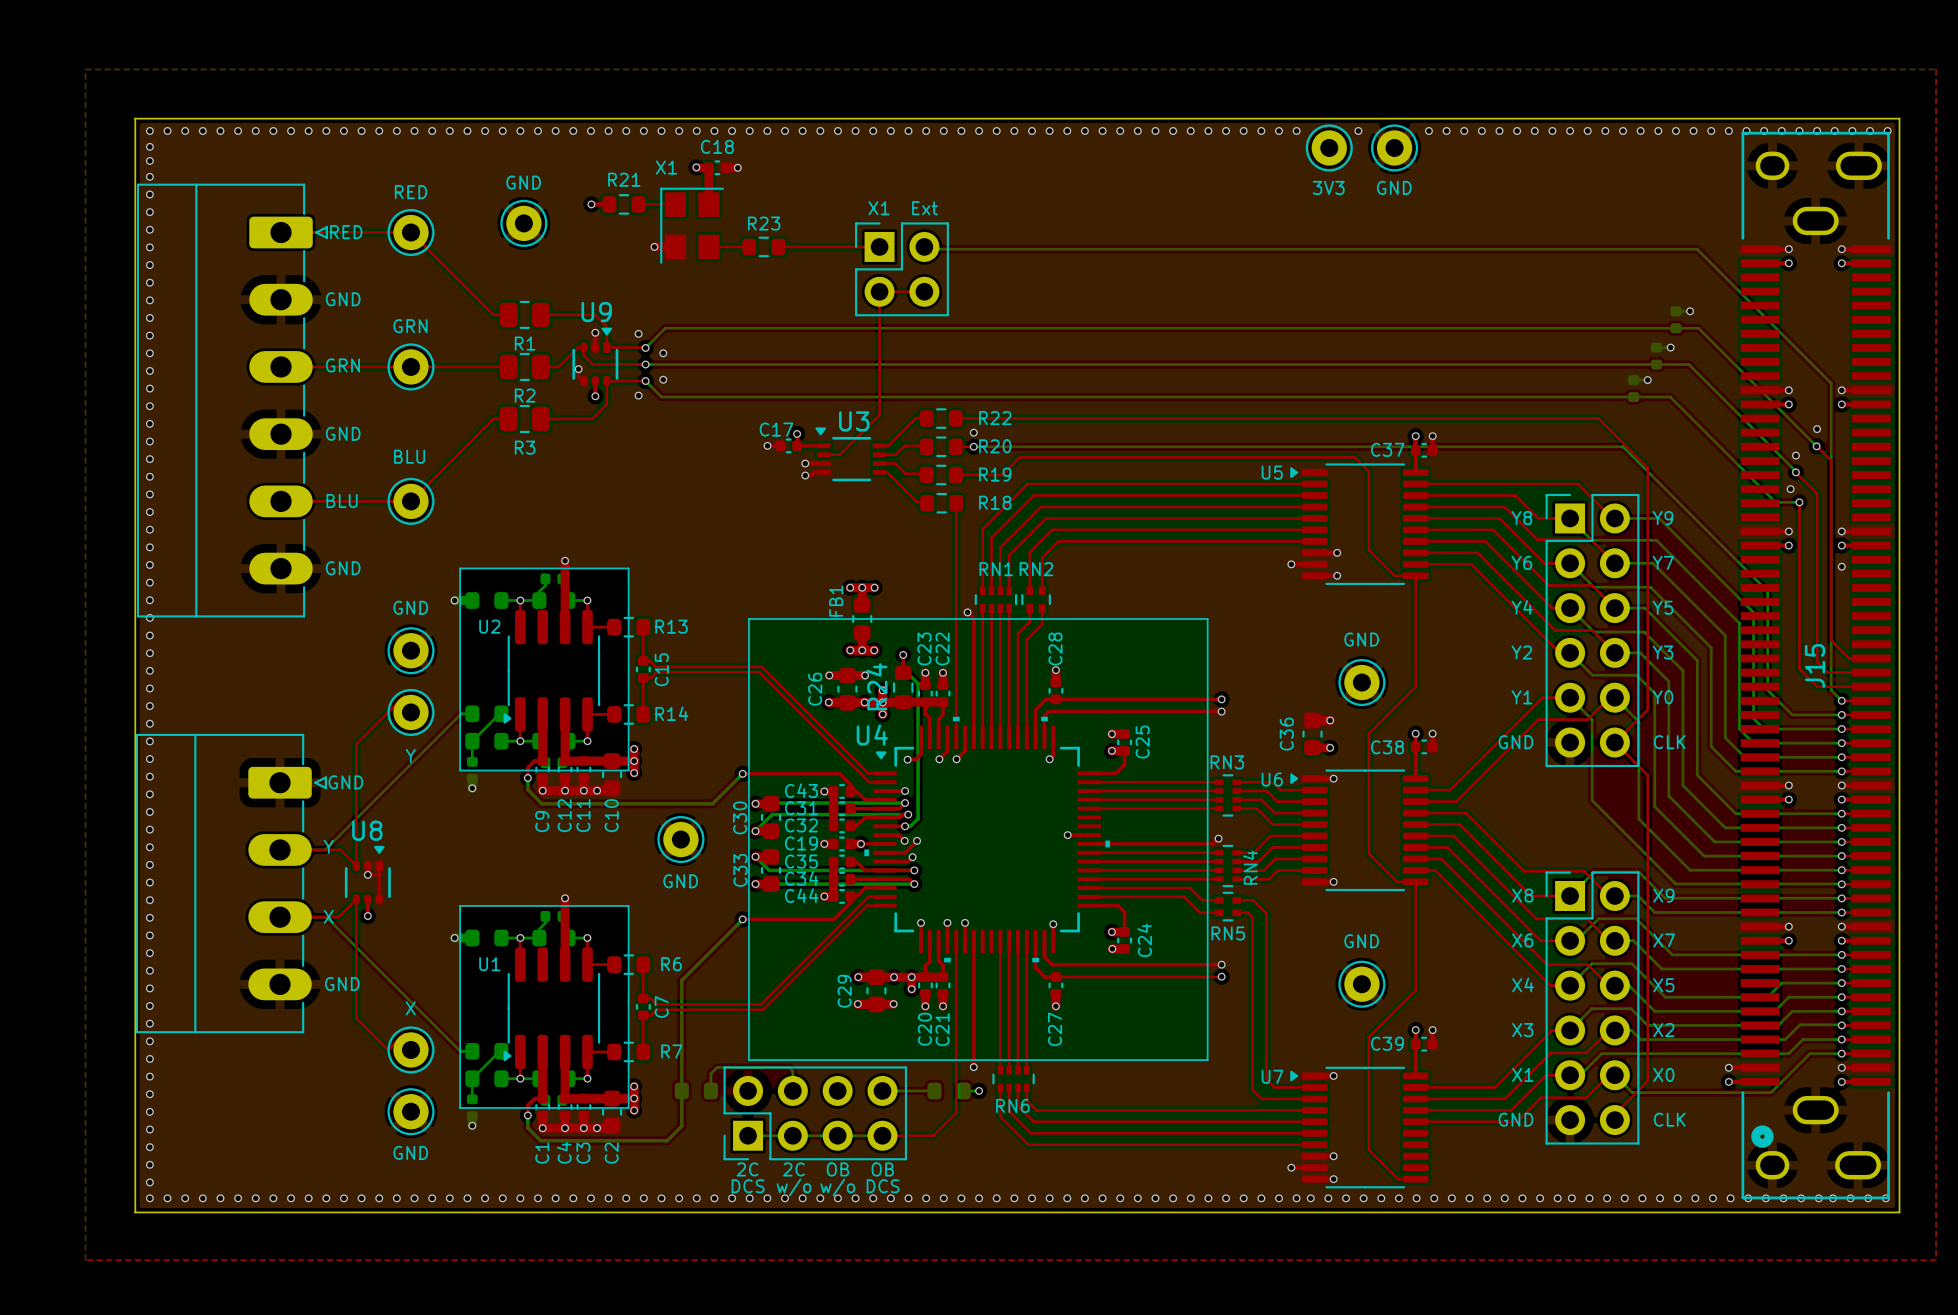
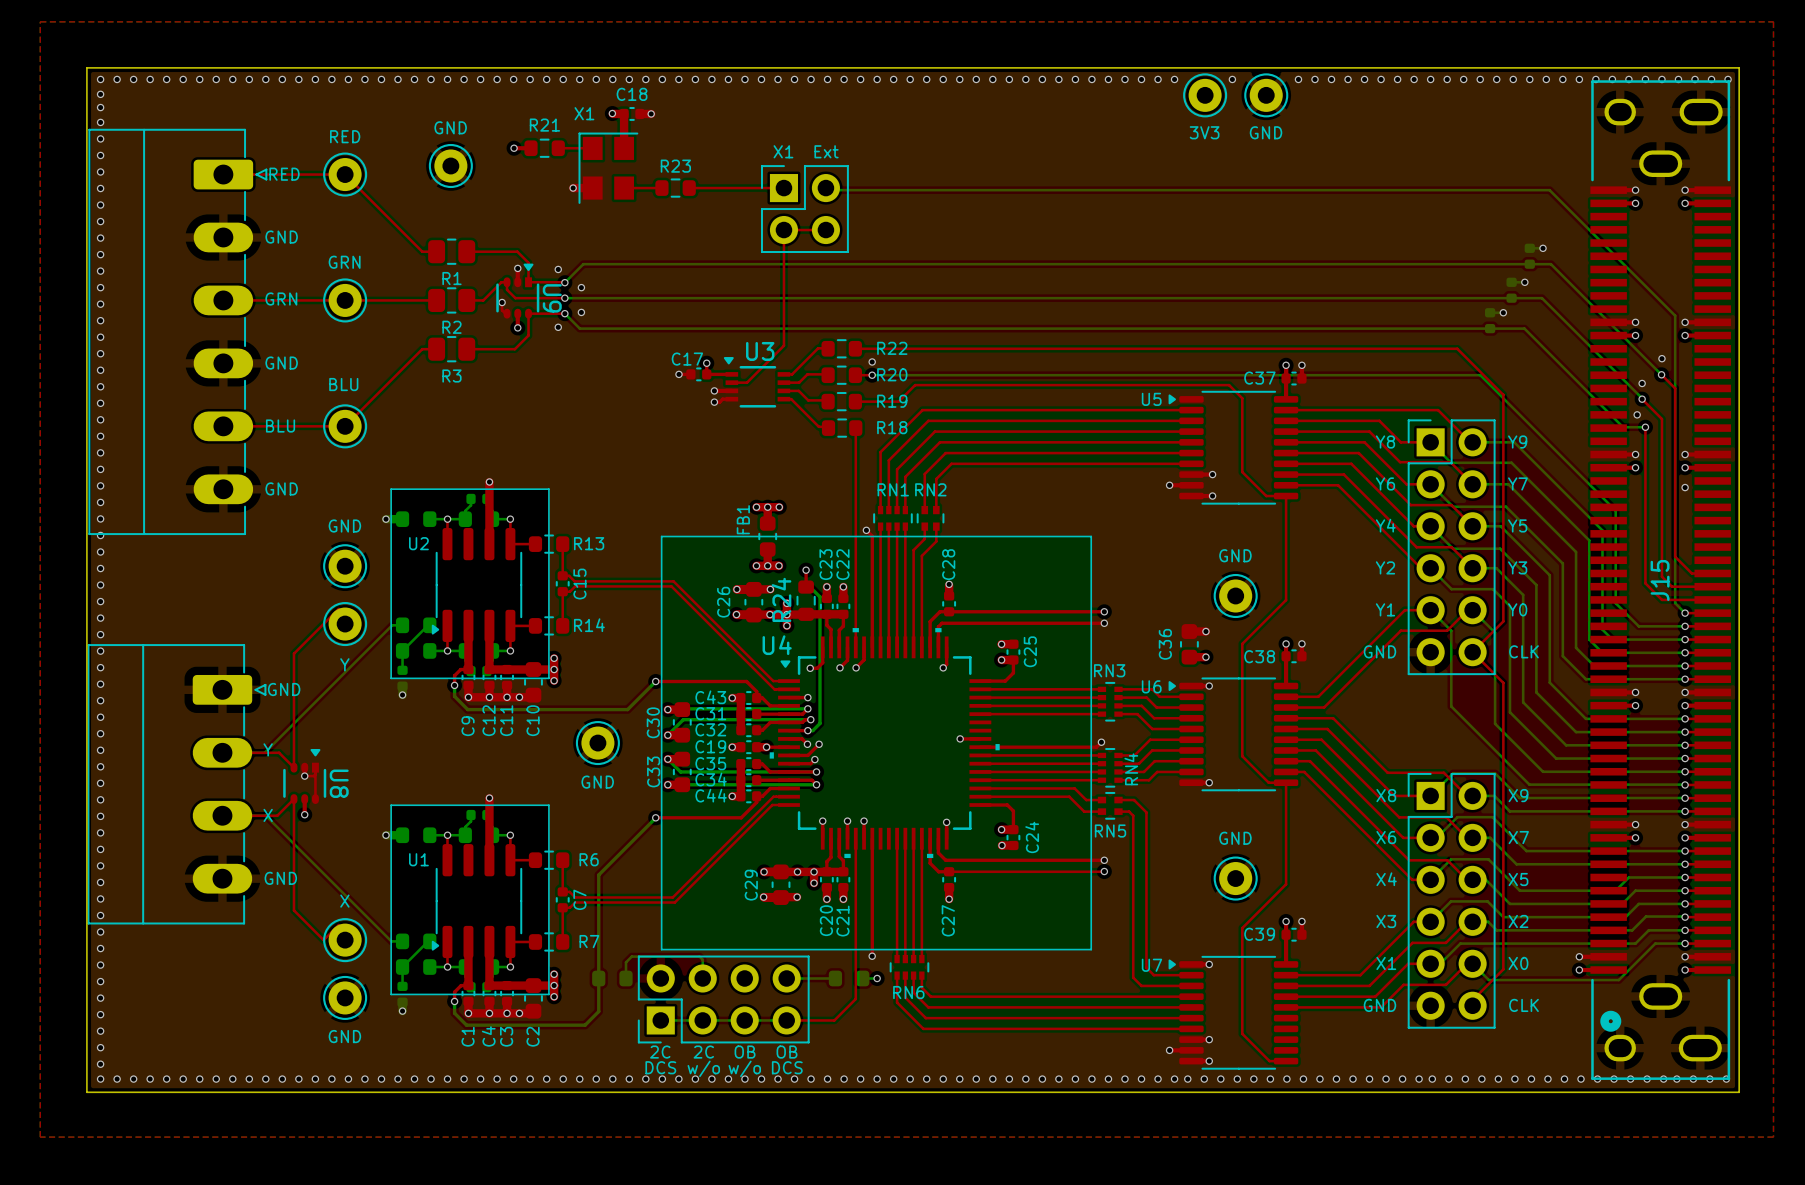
U9 name rotation: 0° (596, 312) -> 90° clockwise (552, 298)
U9 name position: U9 (596, 312) -> U9 (552, 298)
U8 name rotation: 0° (367, 830) -> 90° clockwise (339, 783)
U8 name position: U8 (367, 830) -> U8 (339, 783)

